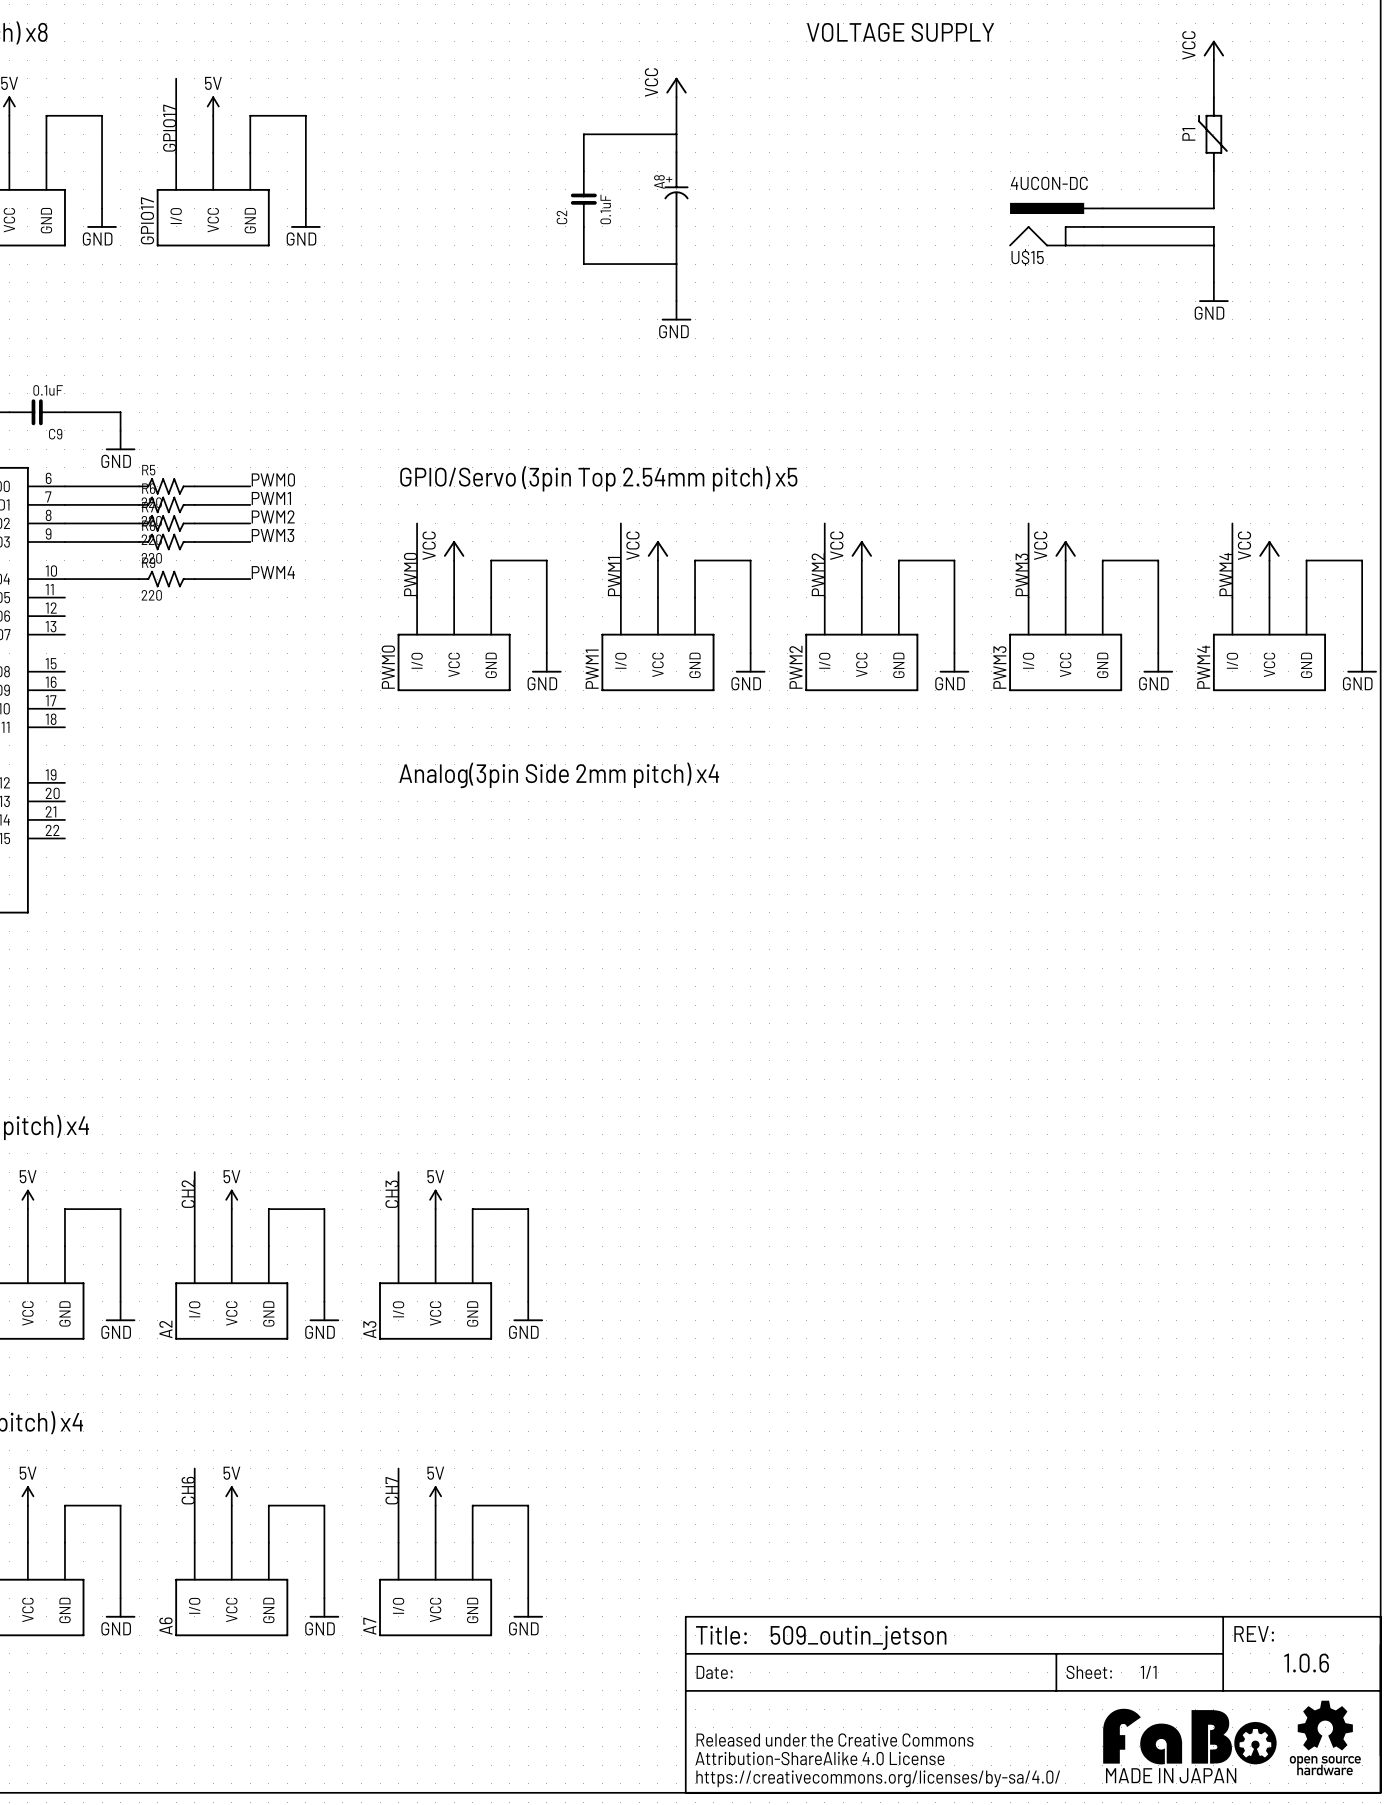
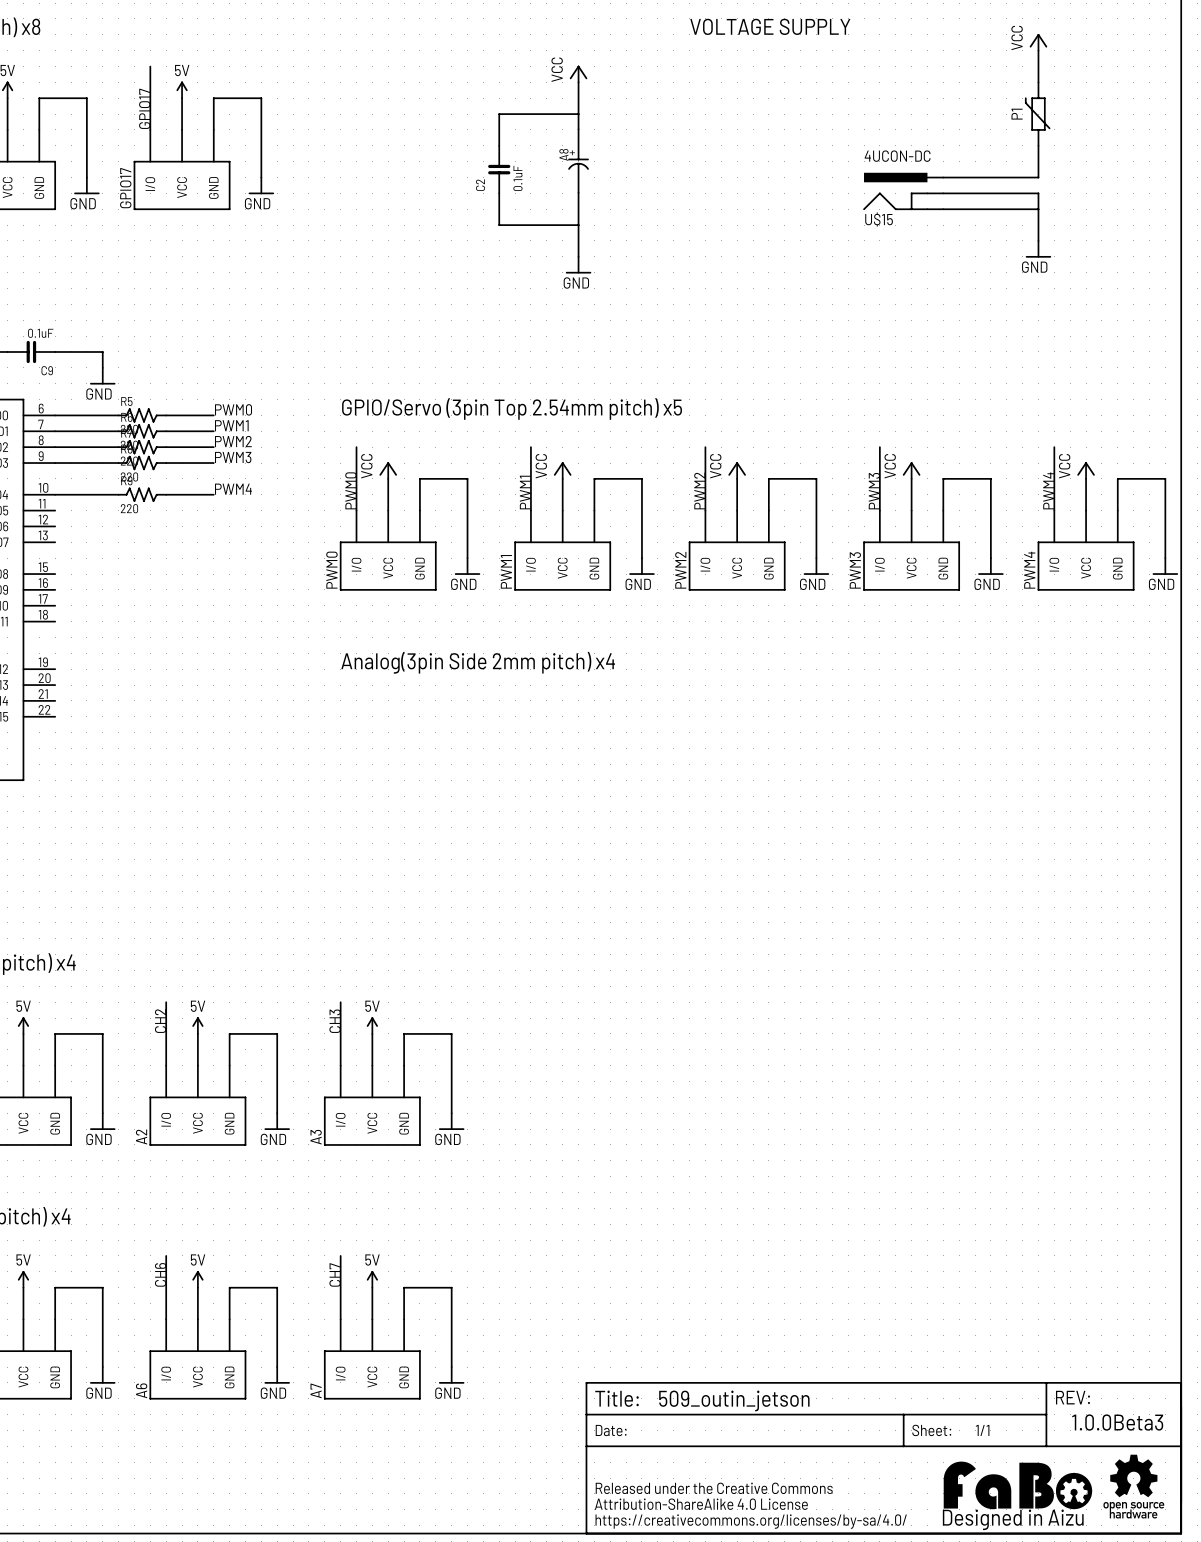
text: 1.0.6 (1306, 1663) -> 1.0.0Beta3 (1117, 1422)
part text: MADE IN JAPAN (1171, 1775) -> none
part text: none -> Designed in Aizu (1013, 1519)

